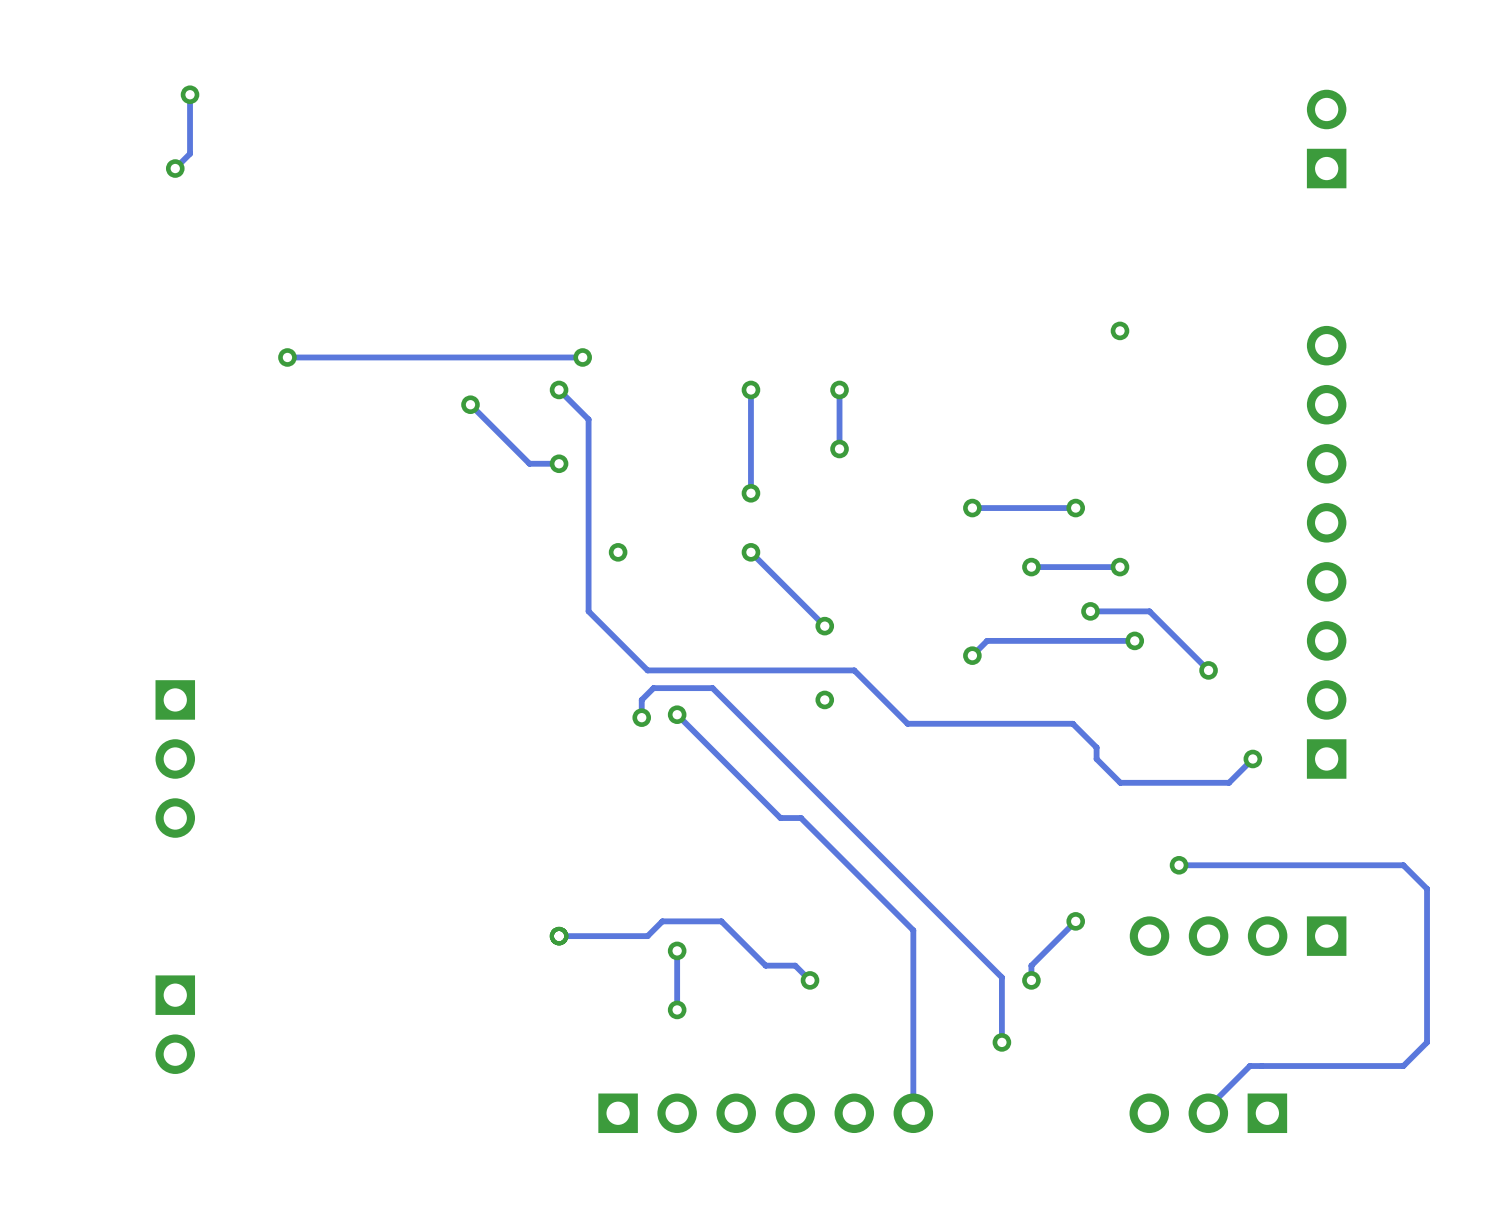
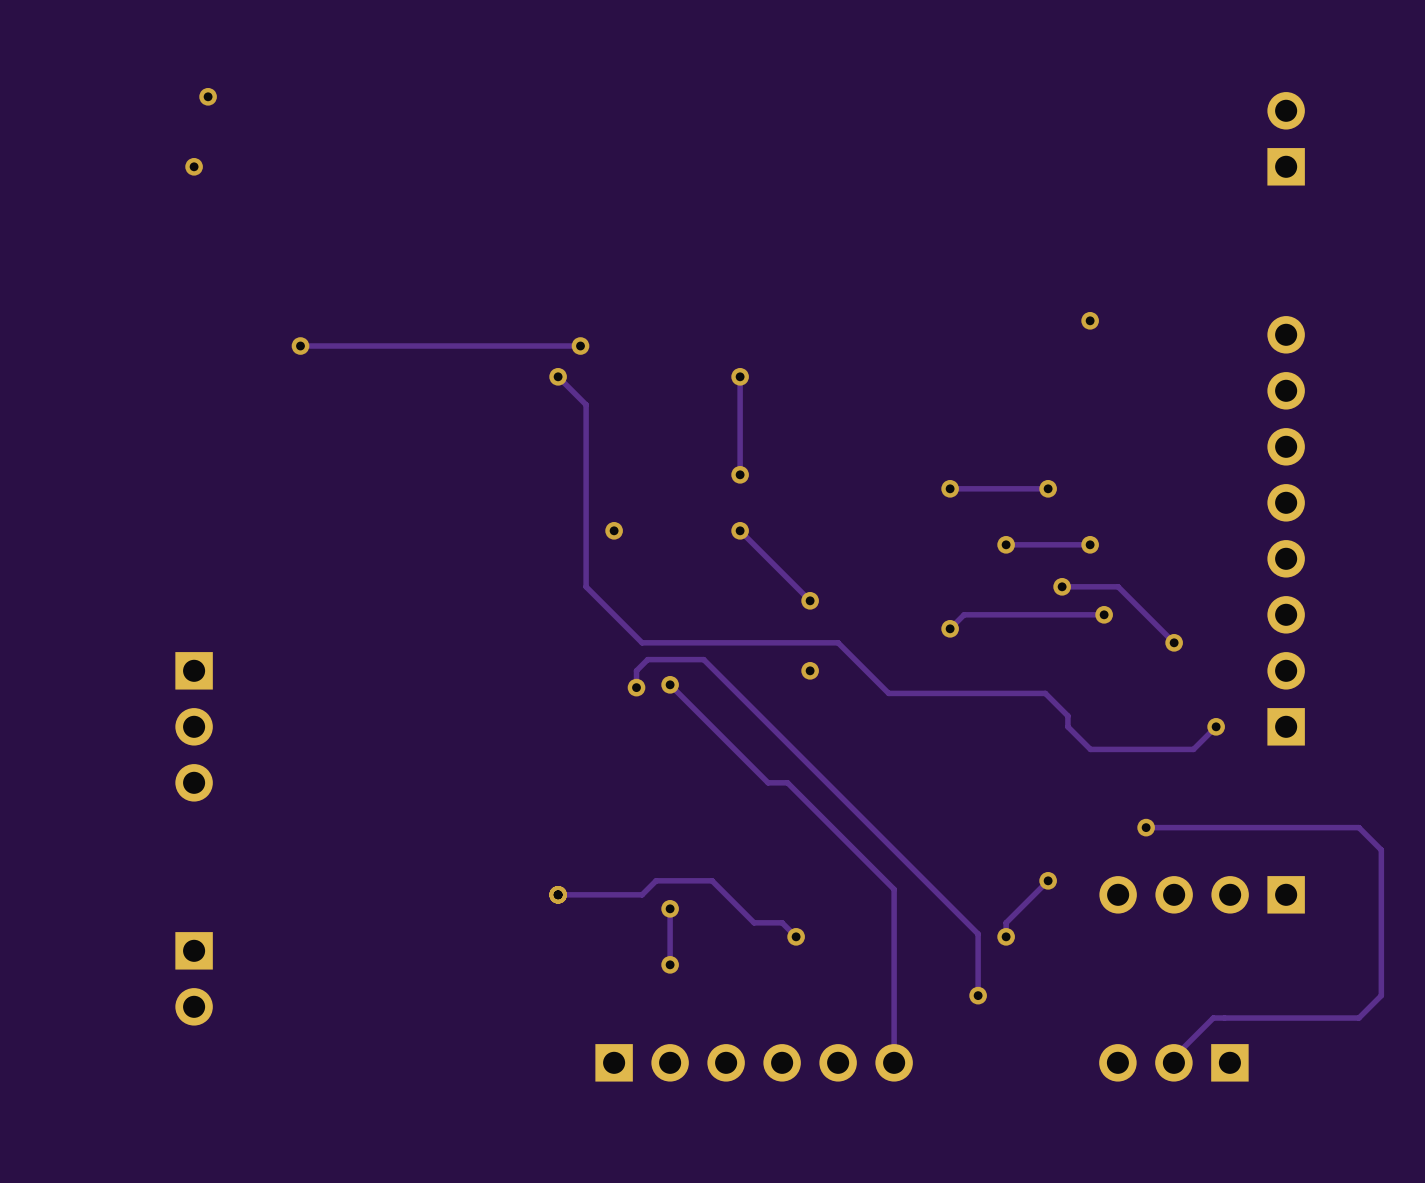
track: (190, 94) (190, 153) (175, 168) -> none
track: (839, 389) (839, 449) -> none
via: (839, 389) -> none
track: (470, 404) (529, 463) (559, 463) -> none
via: (470, 404) -> none
via: (839, 449) -> none
via: (559, 463) -> none

